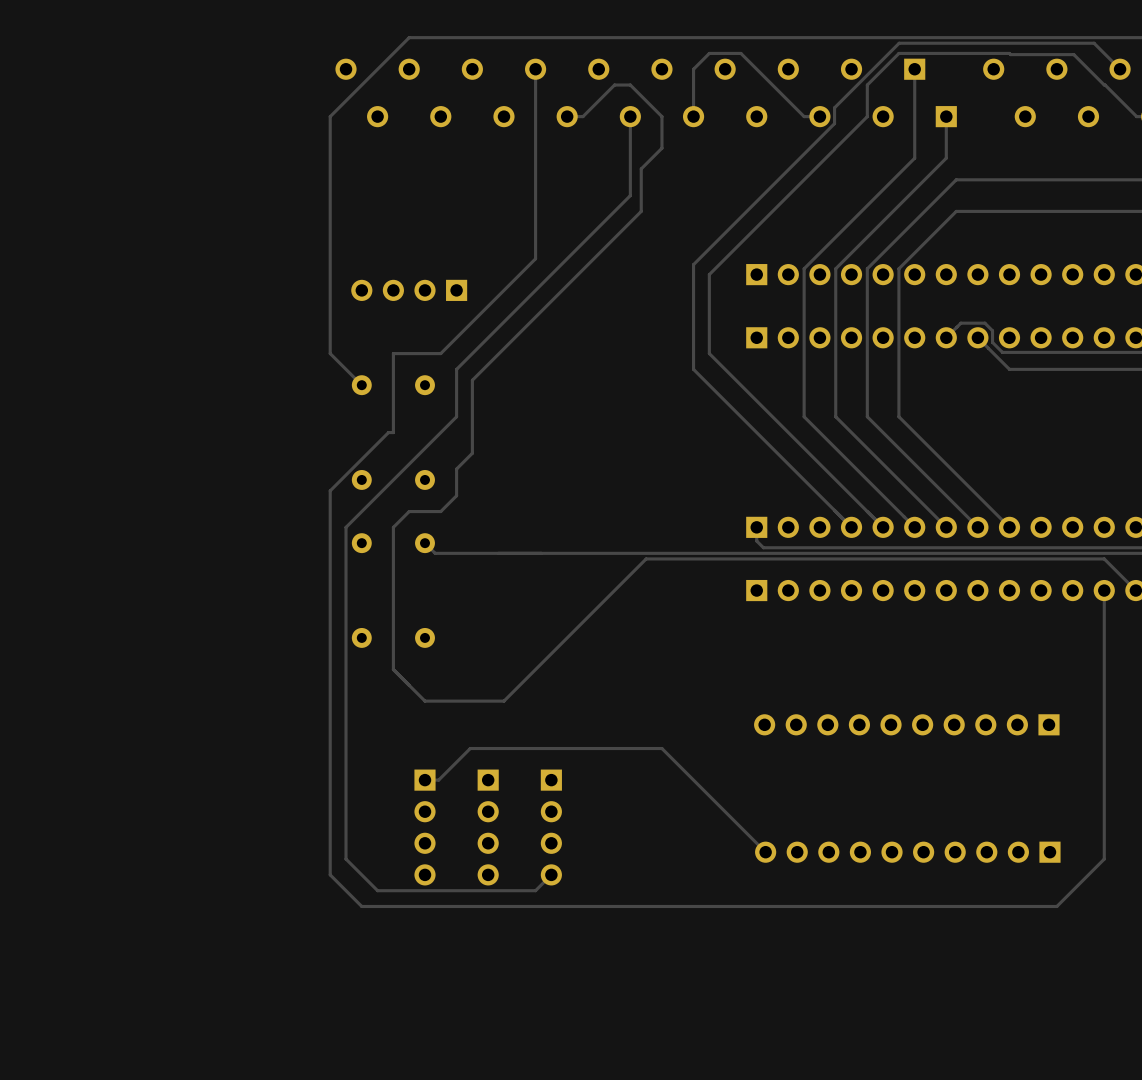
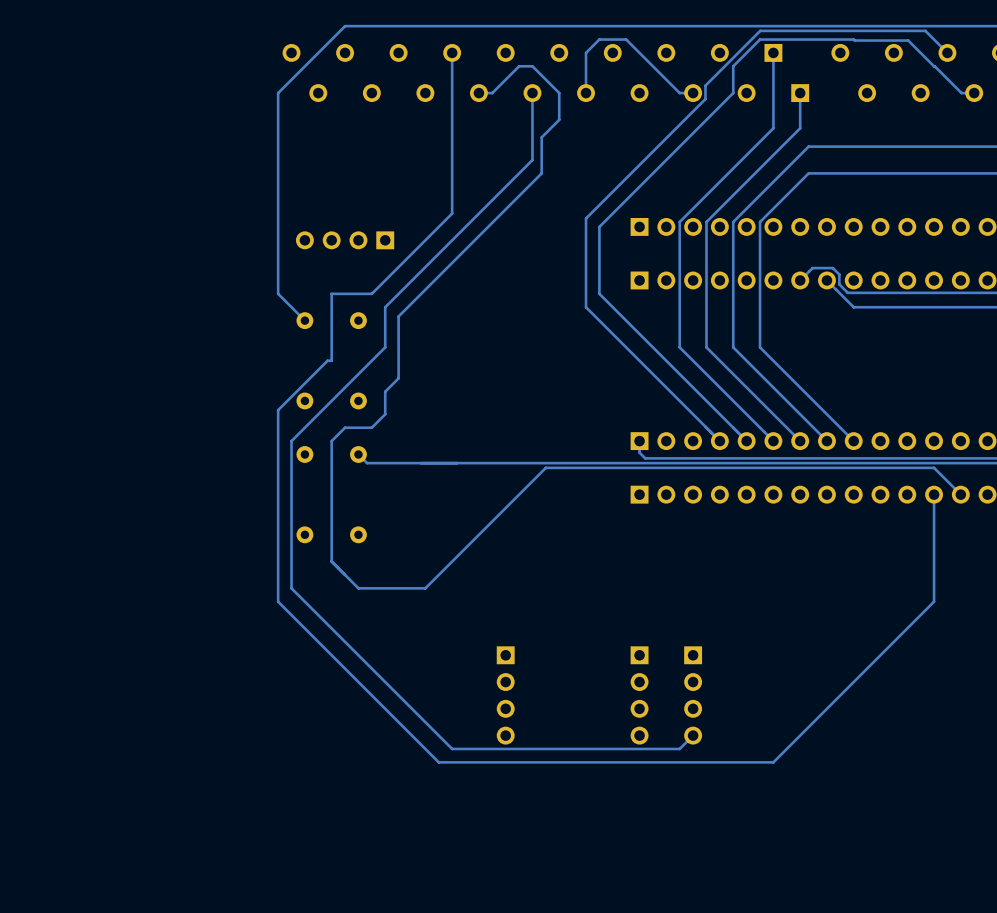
track: (346, 701) (346, 859) (377, 890) (535, 890) (551, 874) -> (291, 588) (452, 748) (679, 748) (693, 735)
track: (330, 716) (330, 874) (361, 906) (519, 906) -> (278, 601) (438, 762)
track: (1104, 716) (1104, 859) (1056, 906) (914, 906) -> (934, 601) (773, 762)
part: (906, 724) -> none
track: (425, 780) (438, 780) (470, 748) (661, 748) (765, 852) -> none
part: (425, 827) -> none
part: (488, 827) -> none
part position: (551, 827) -> (505, 695)
part: none -> (639, 695)
part: none -> (693, 695)
part: (907, 852) -> none

